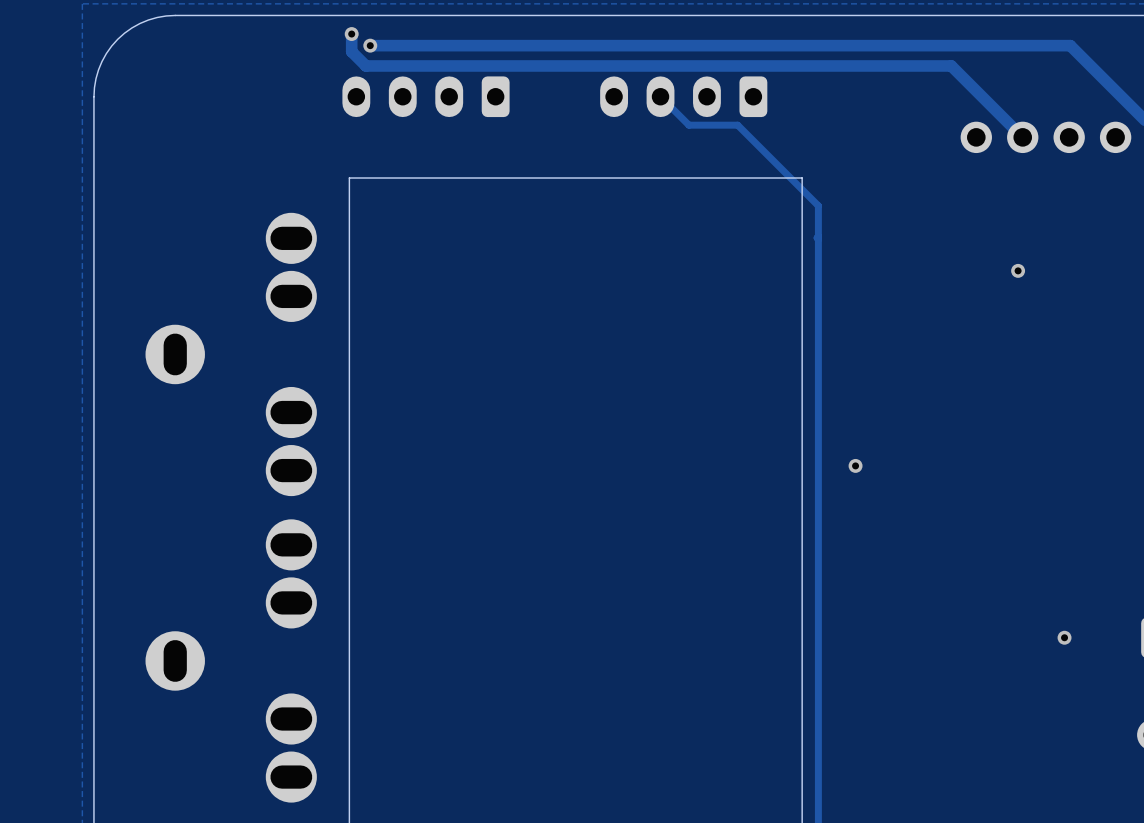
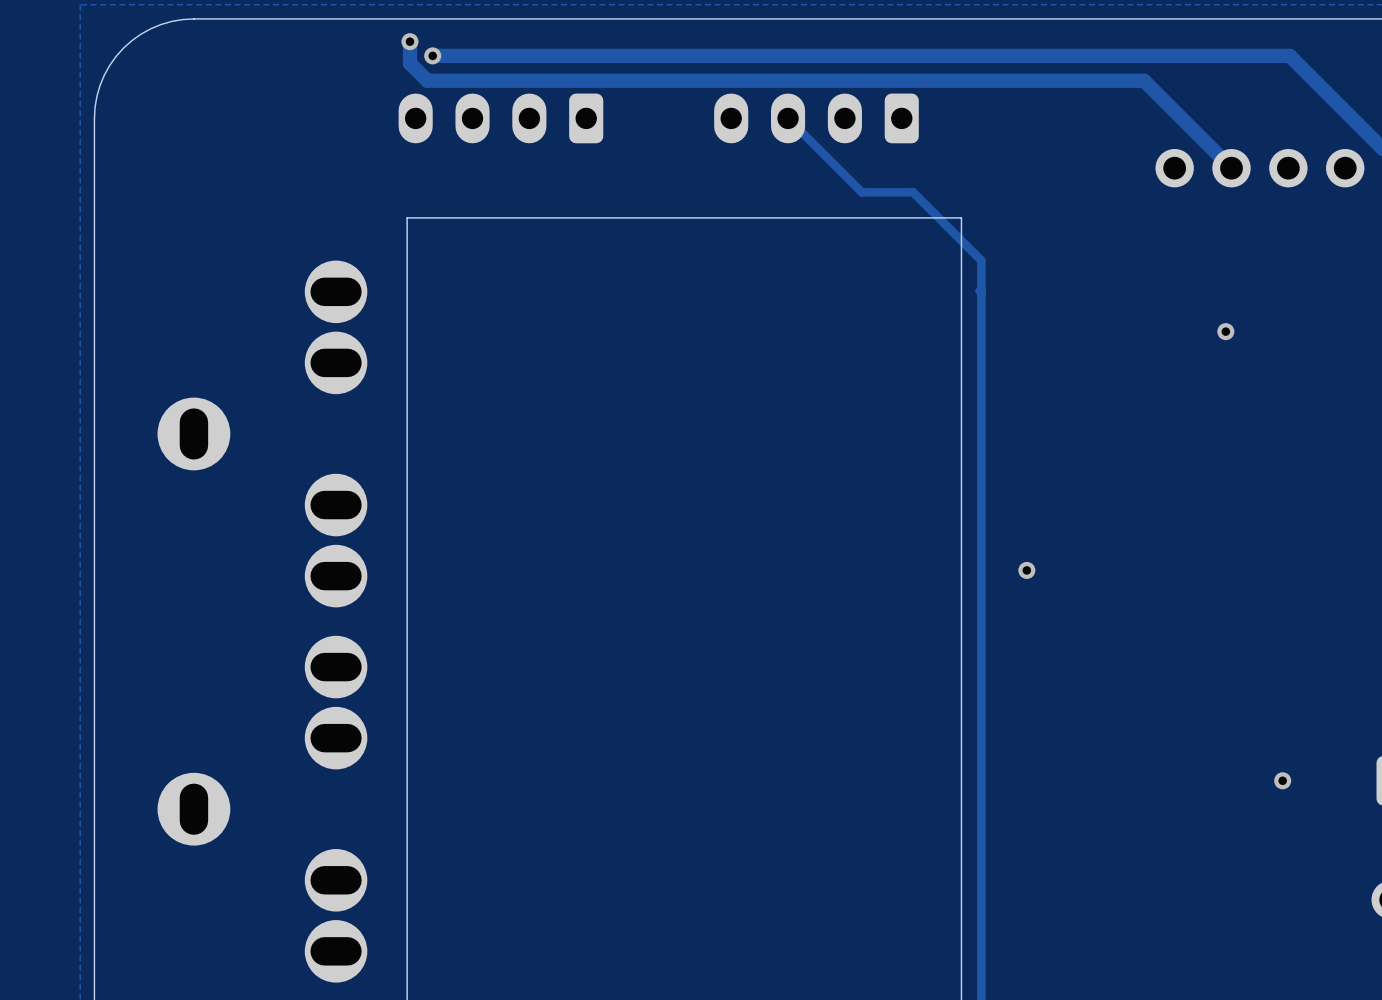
track: (688, 125) (737, 125) (818, 205) (818, 212) -> (822, 153) (861, 192) (913, 192) (981, 260)

